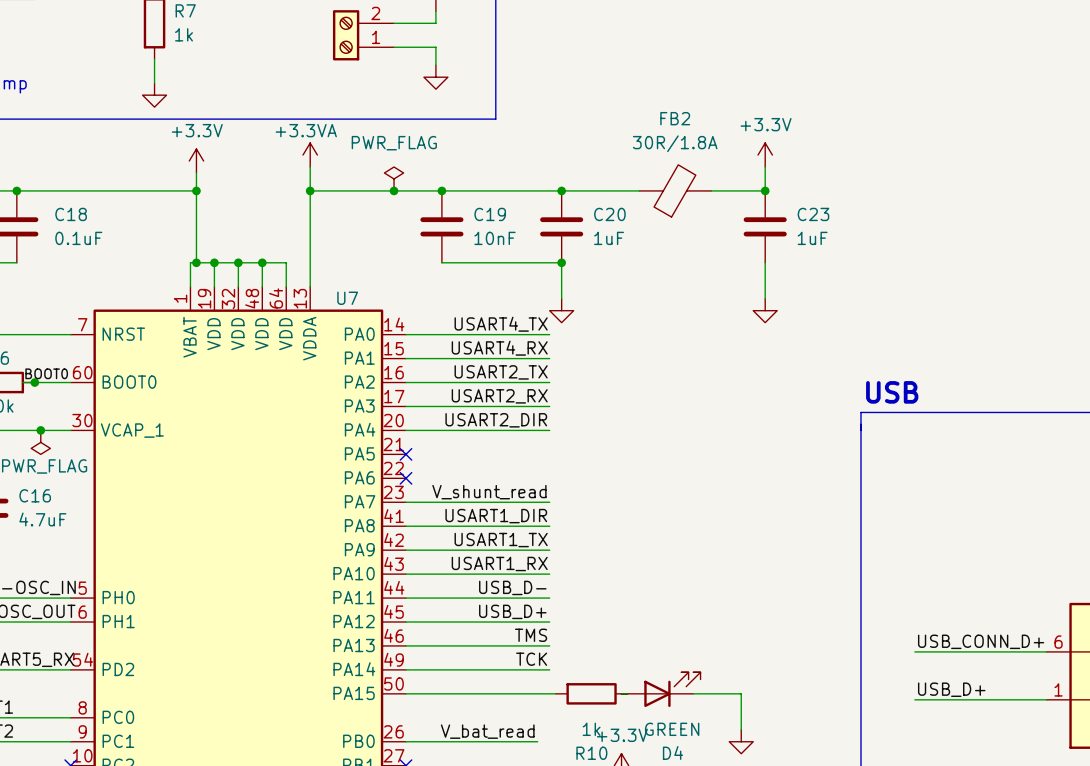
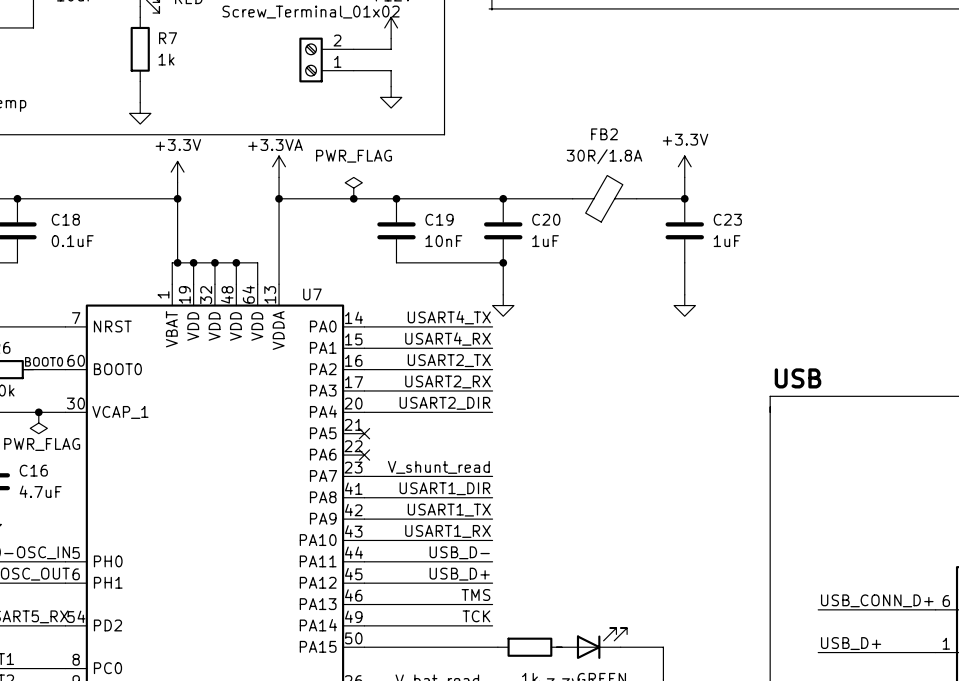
junction: (34, 382) -> none

